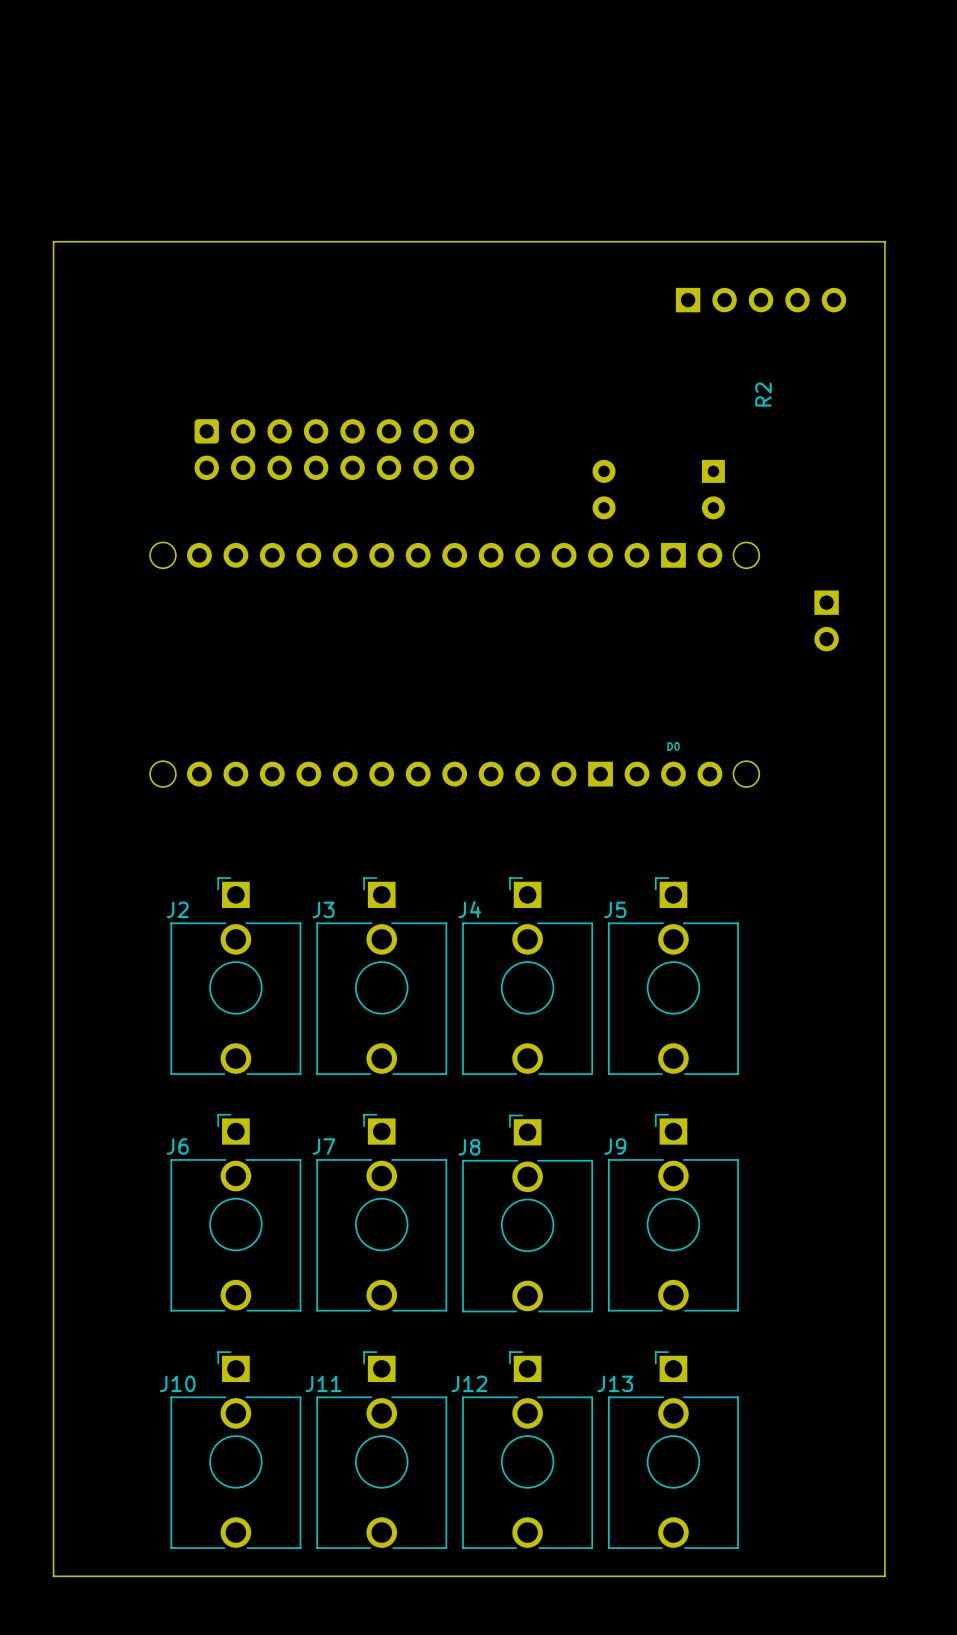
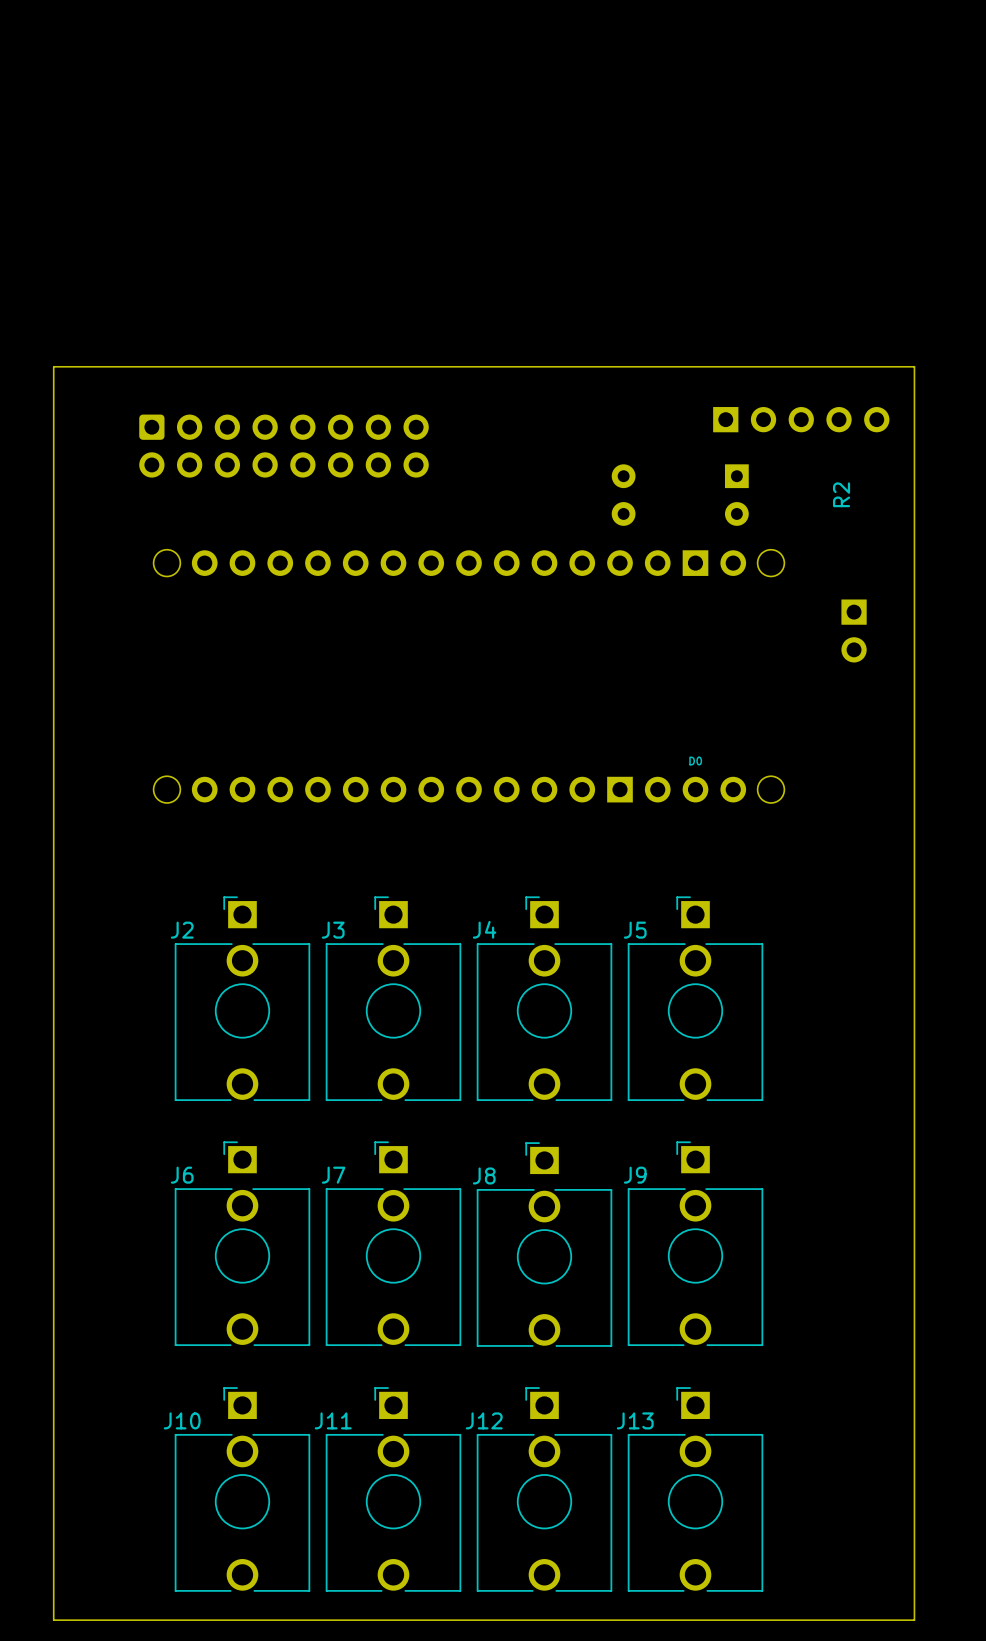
part position: (761, 300) -> (801, 419)
board edge: (53, 365) (53, 241) (884, 241) (884, 365) -> (53, 366) (914, 366)
R2 position: (763, 394) -> (841, 494)
part position: (334, 449) -> (284, 446)

